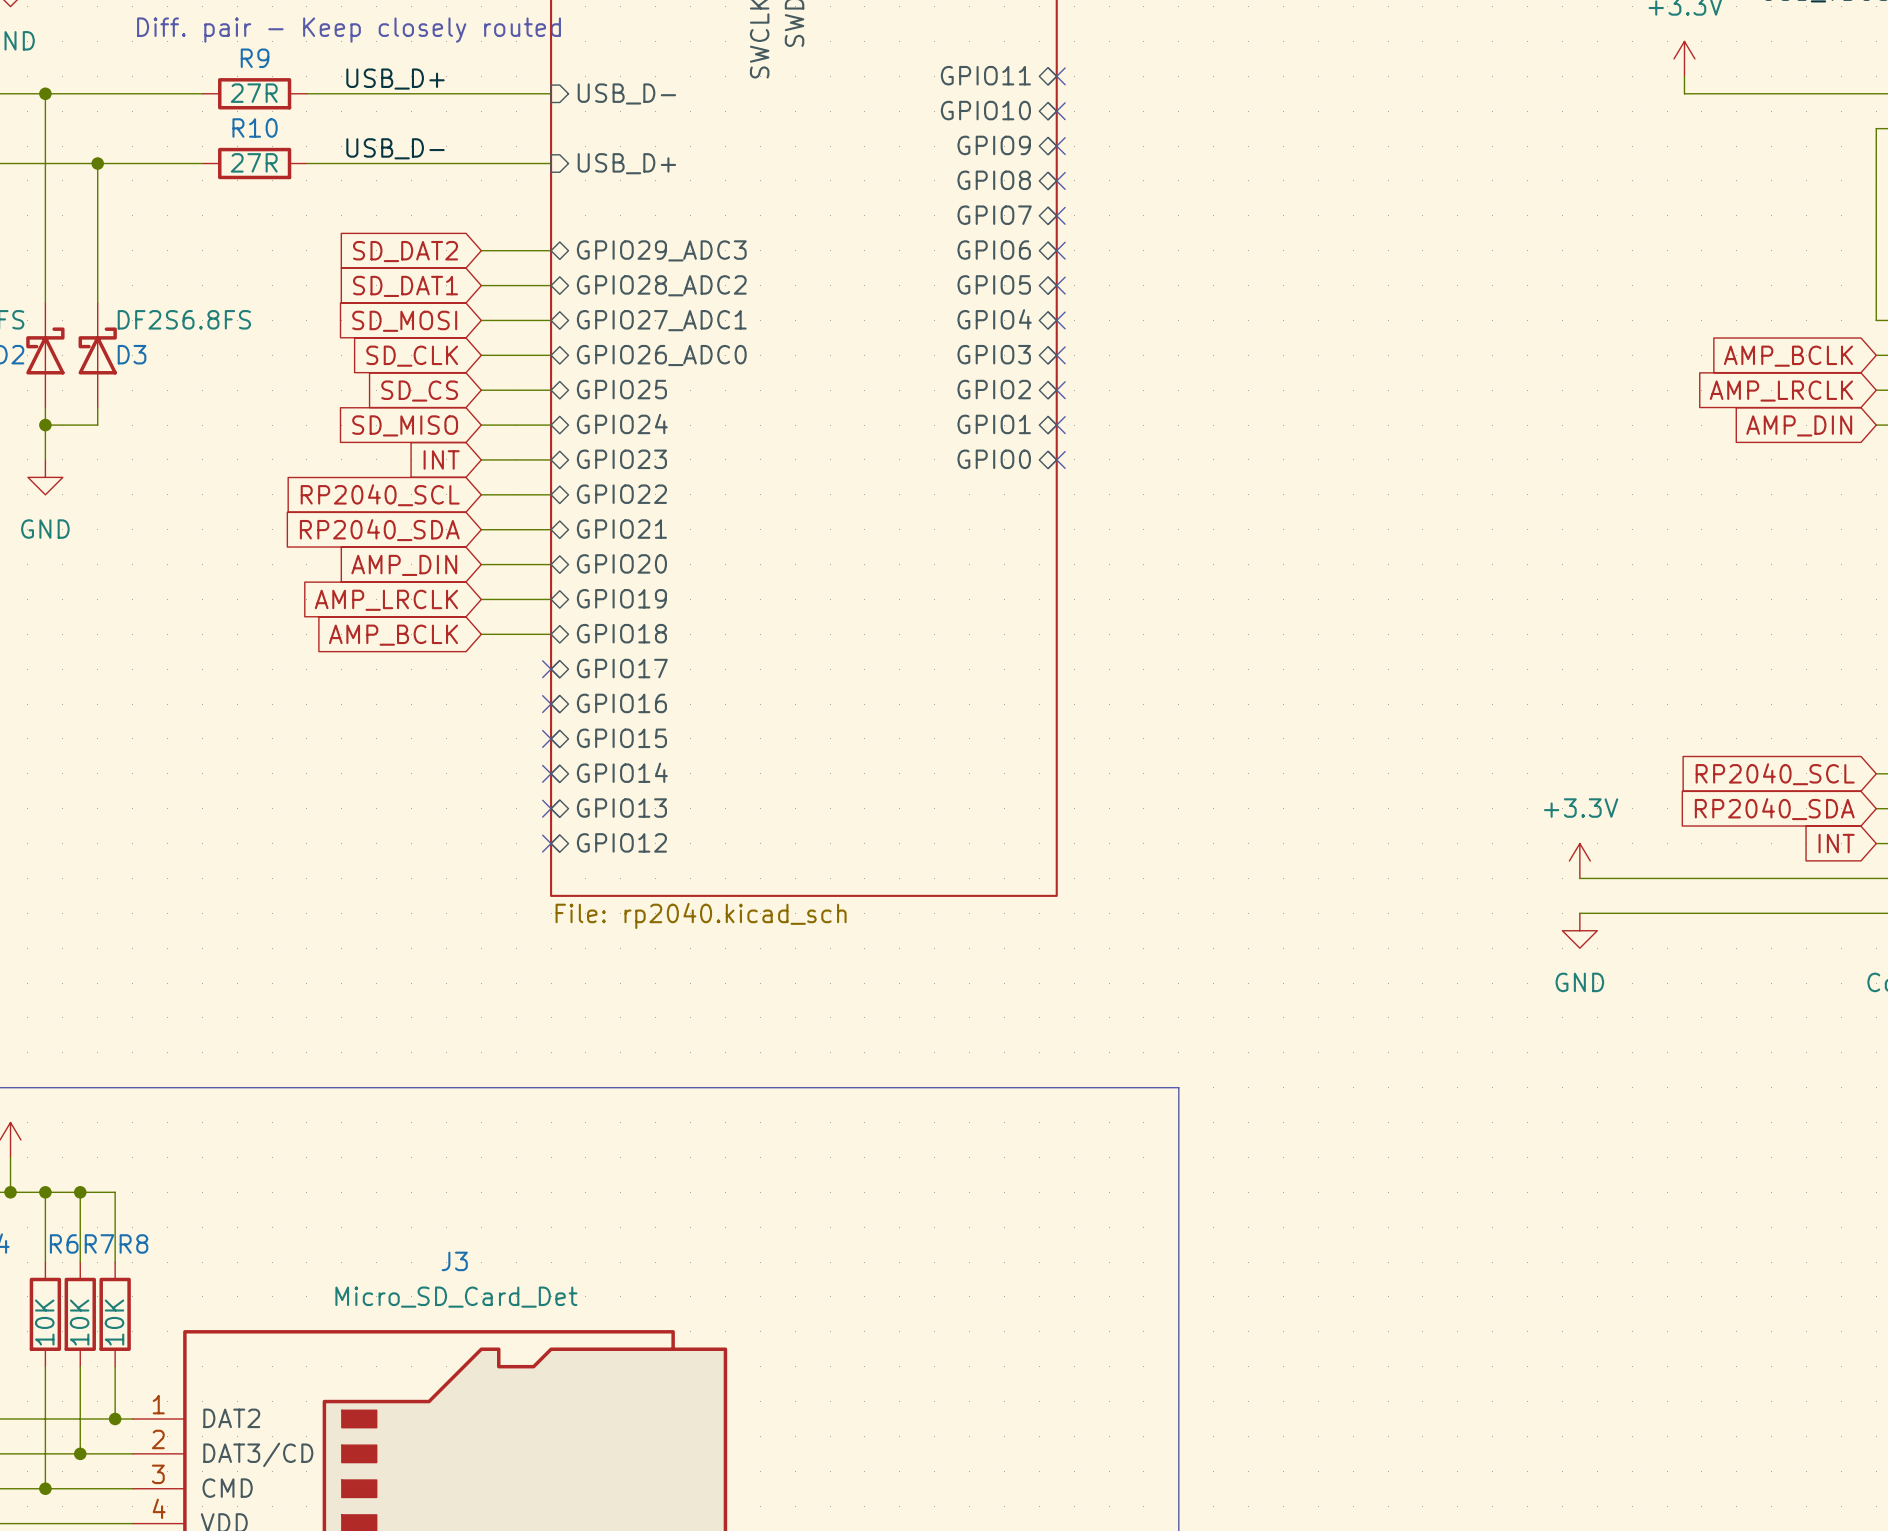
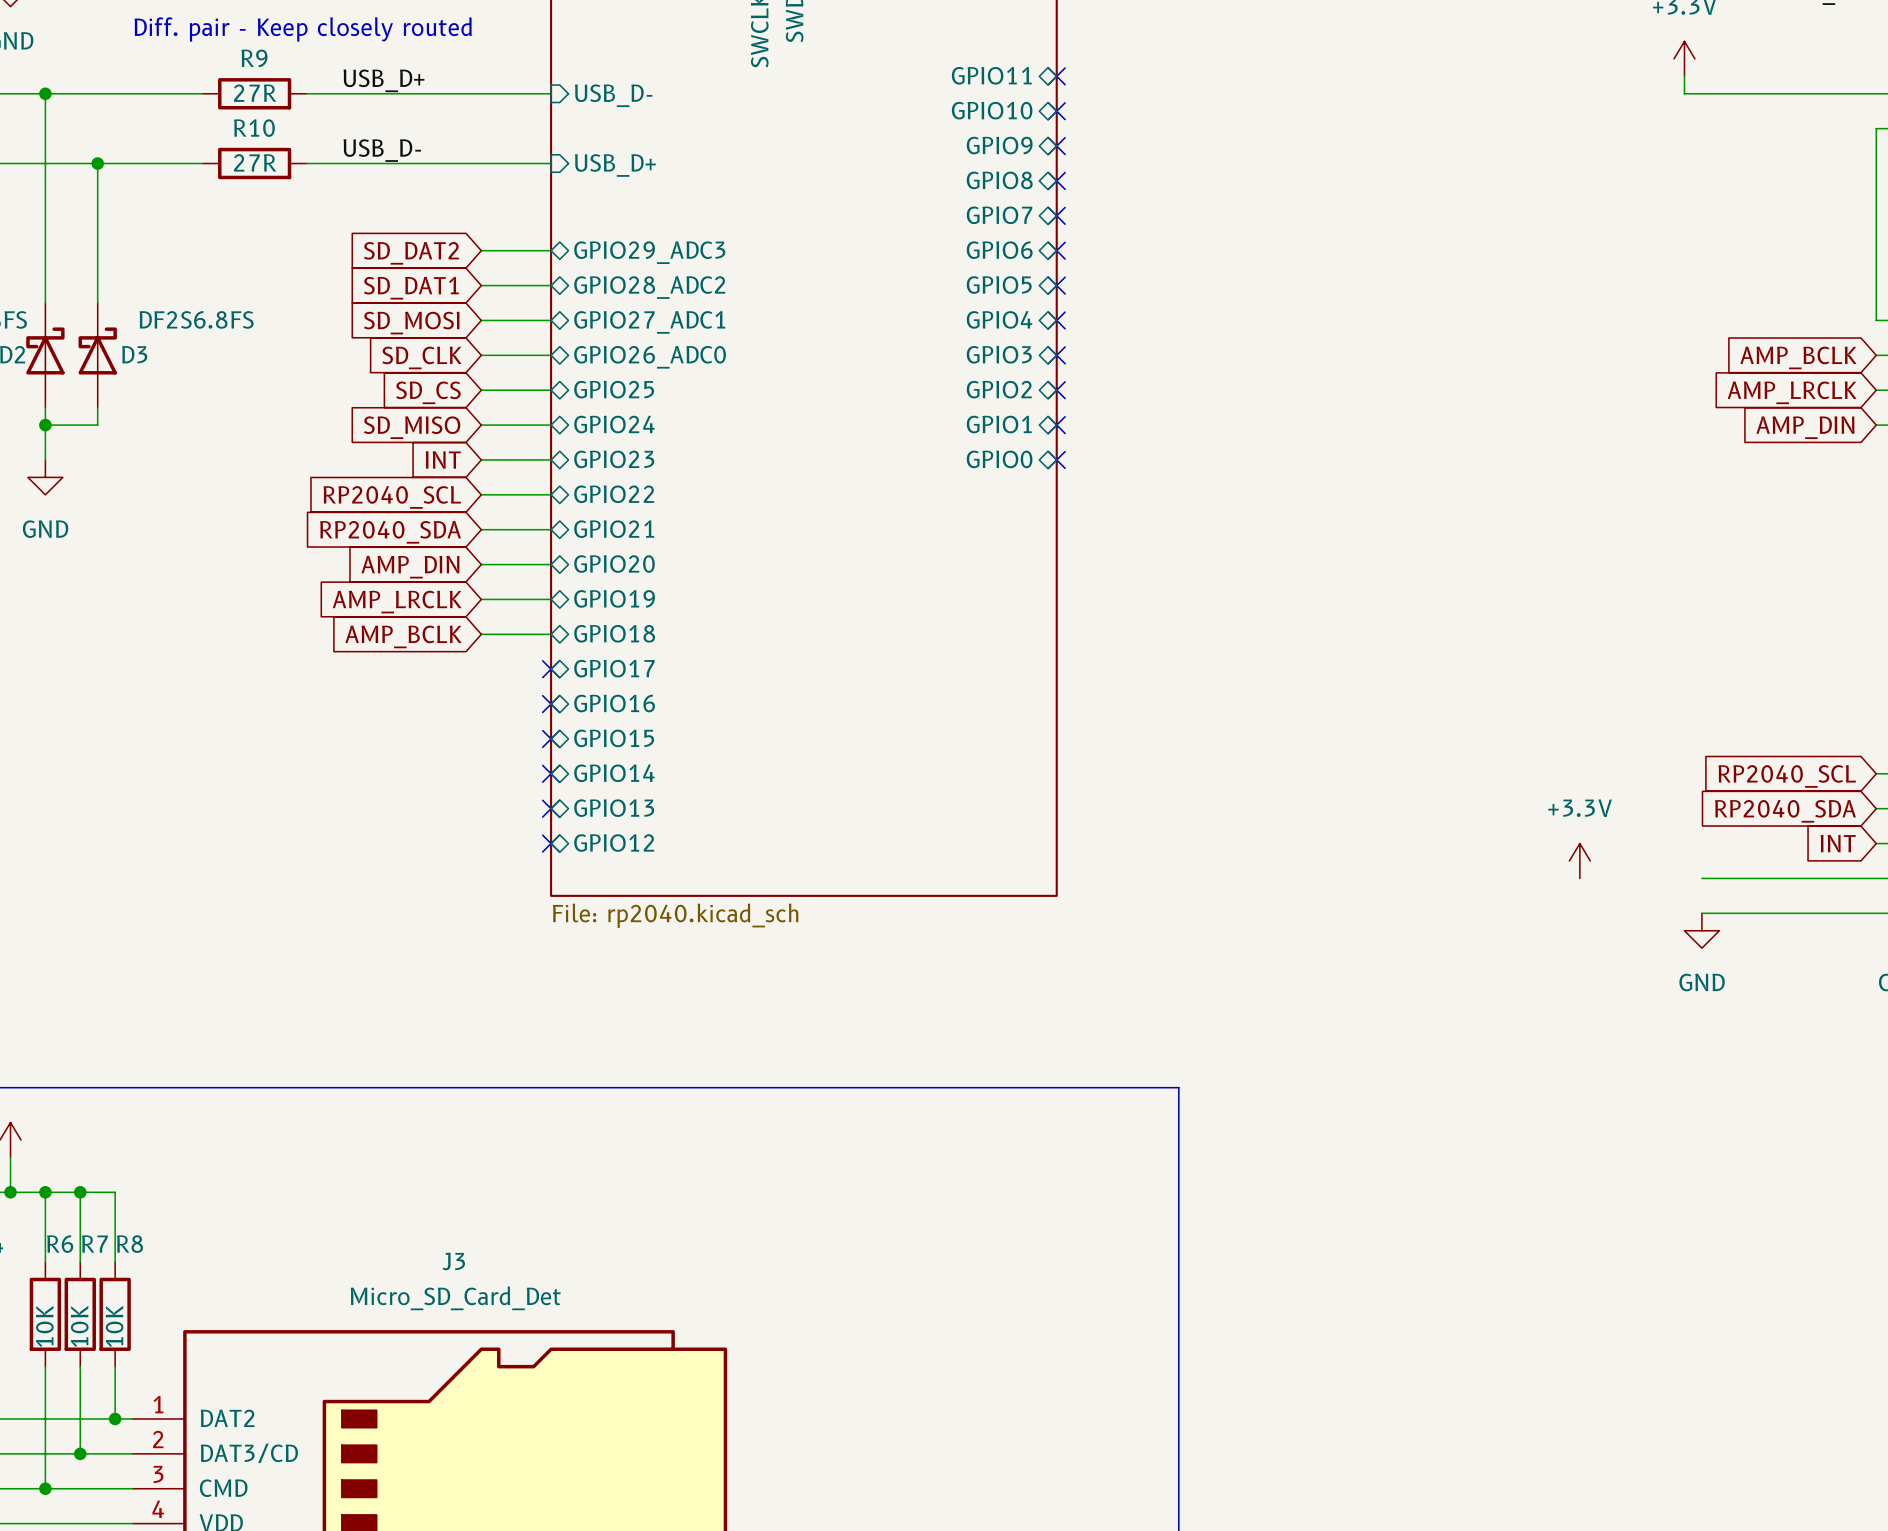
wire: (1579, 878) (1701, 878) -> none
wire: (1579, 913) (1701, 913) -> none
power symbol position: GND (1579, 930) -> GND (1701, 930)

